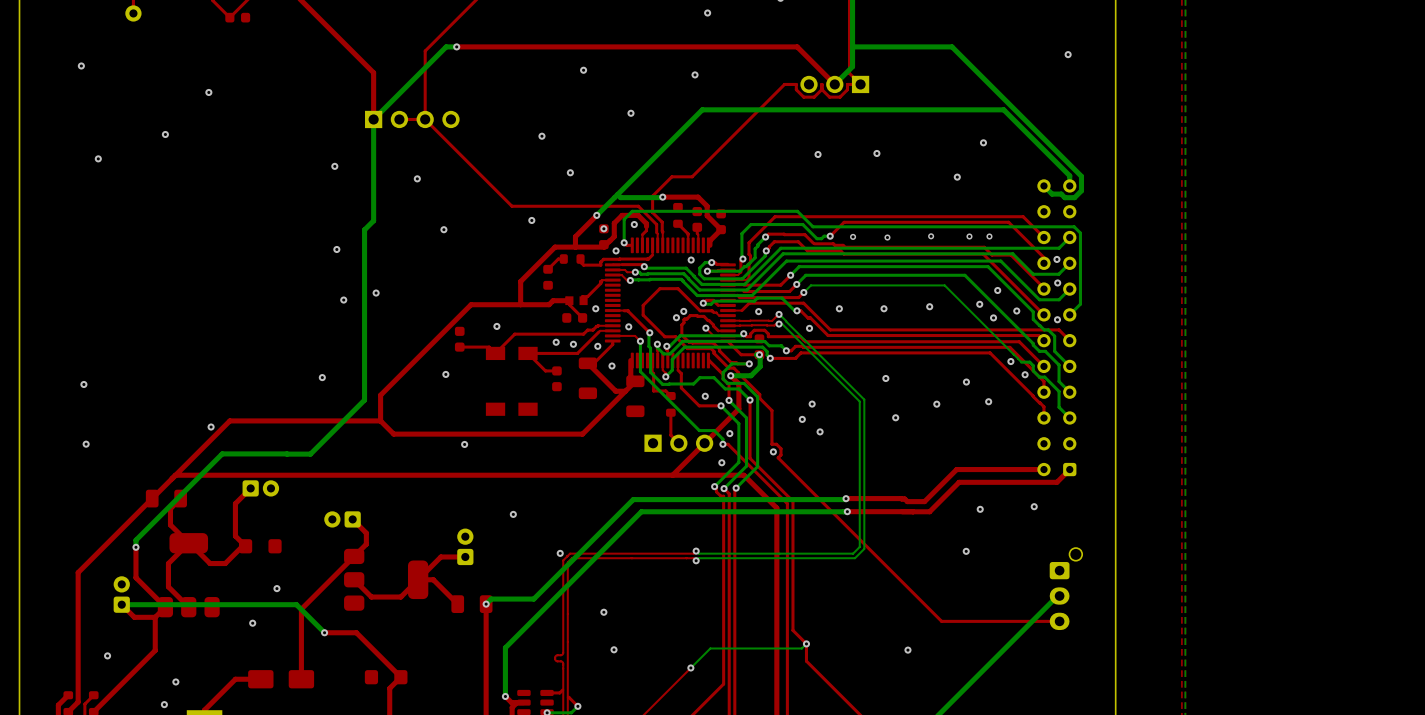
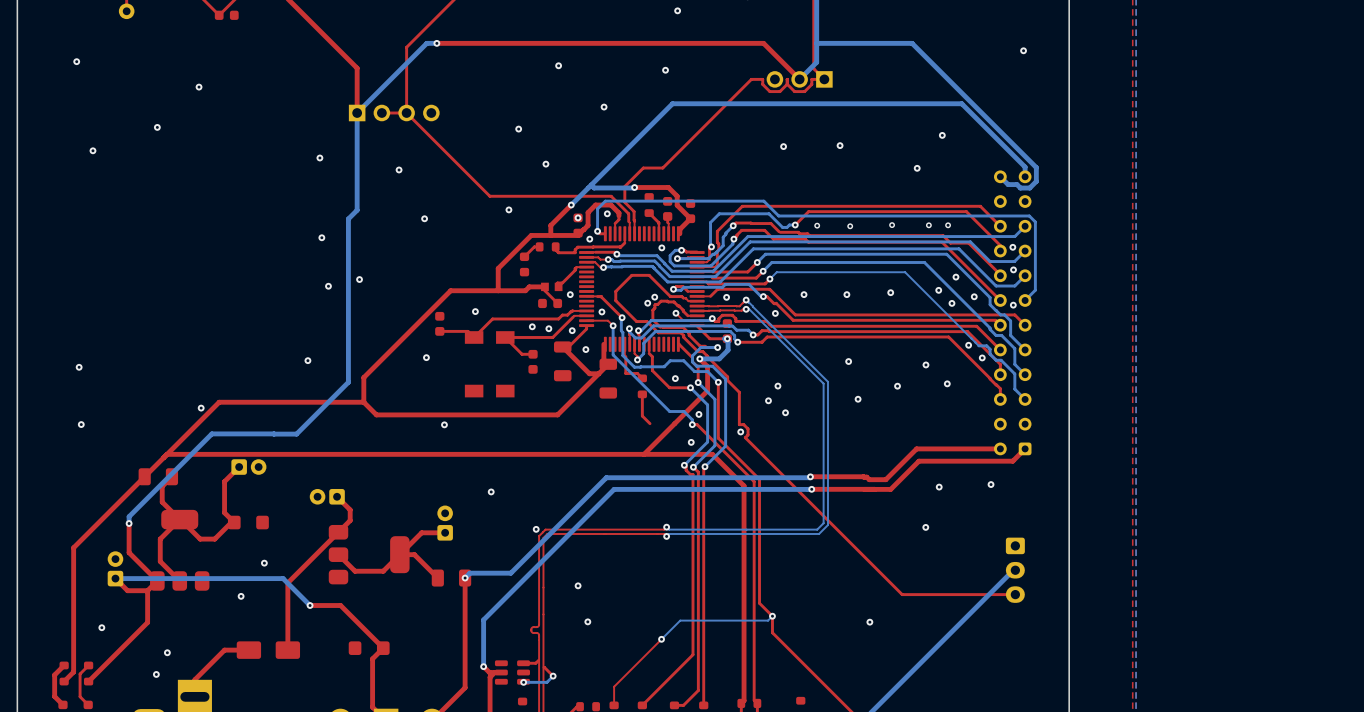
part: (678, 443) -> none
part footprint: [1049, 548, 1083, 631] -> [1005, 537, 1025, 603]

